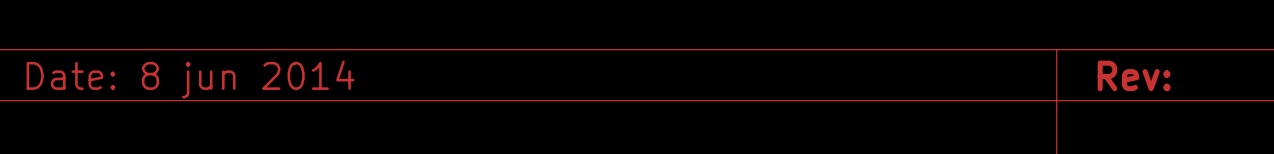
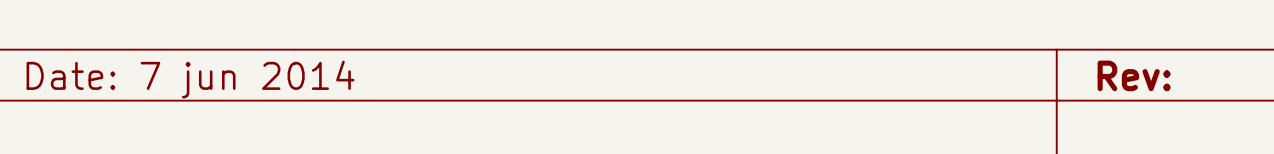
title block: Date: 8 jun 2014 (190, 79) -> Date: 7 jun 2014 (190, 79)

